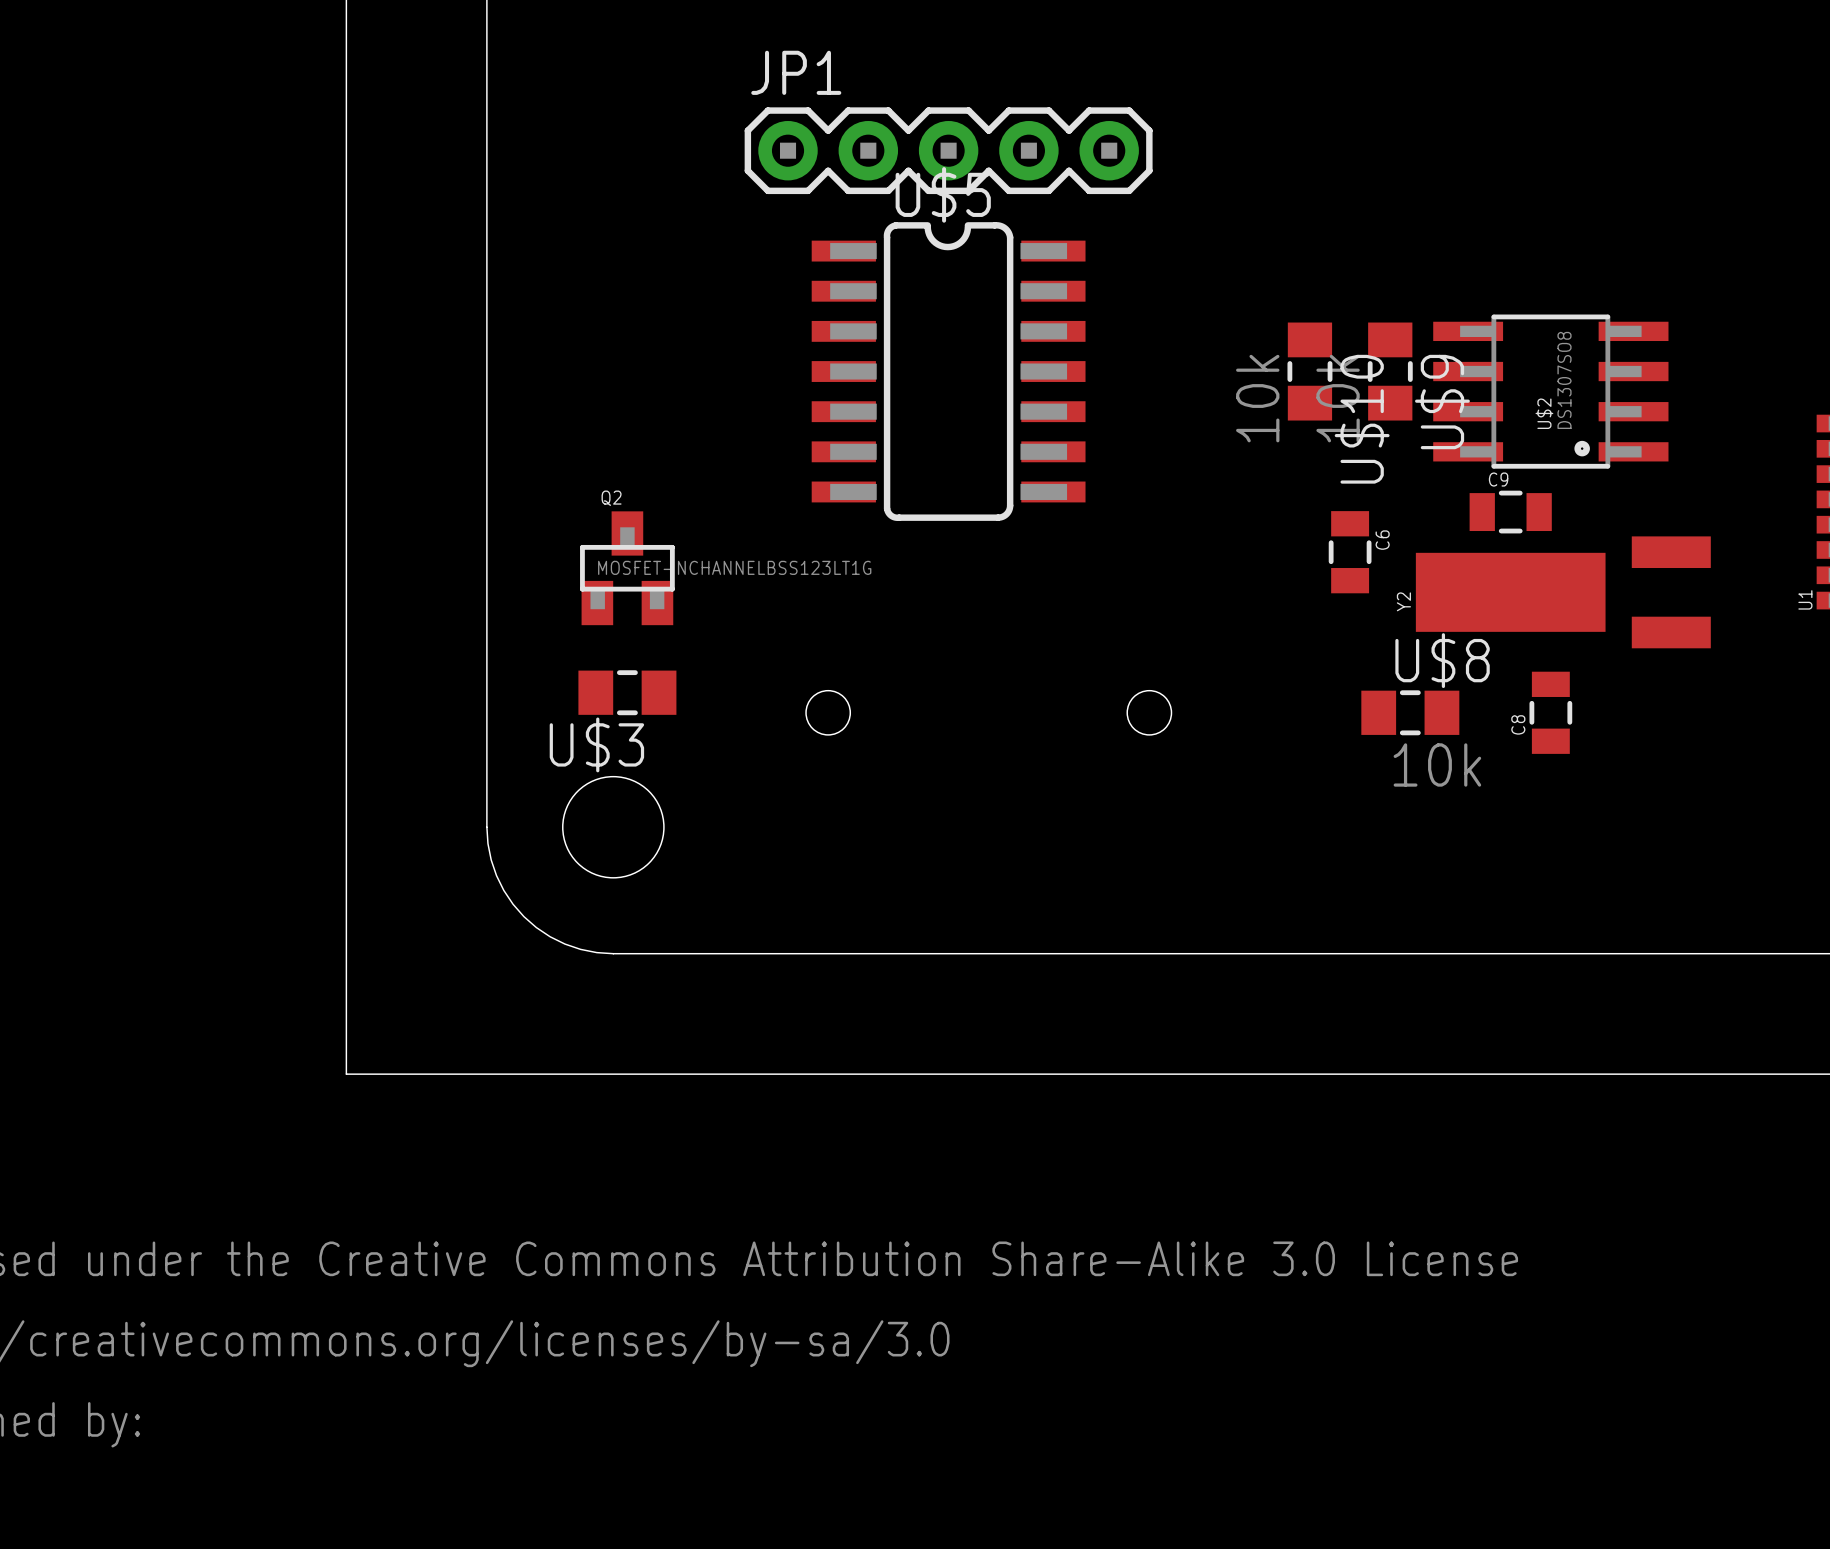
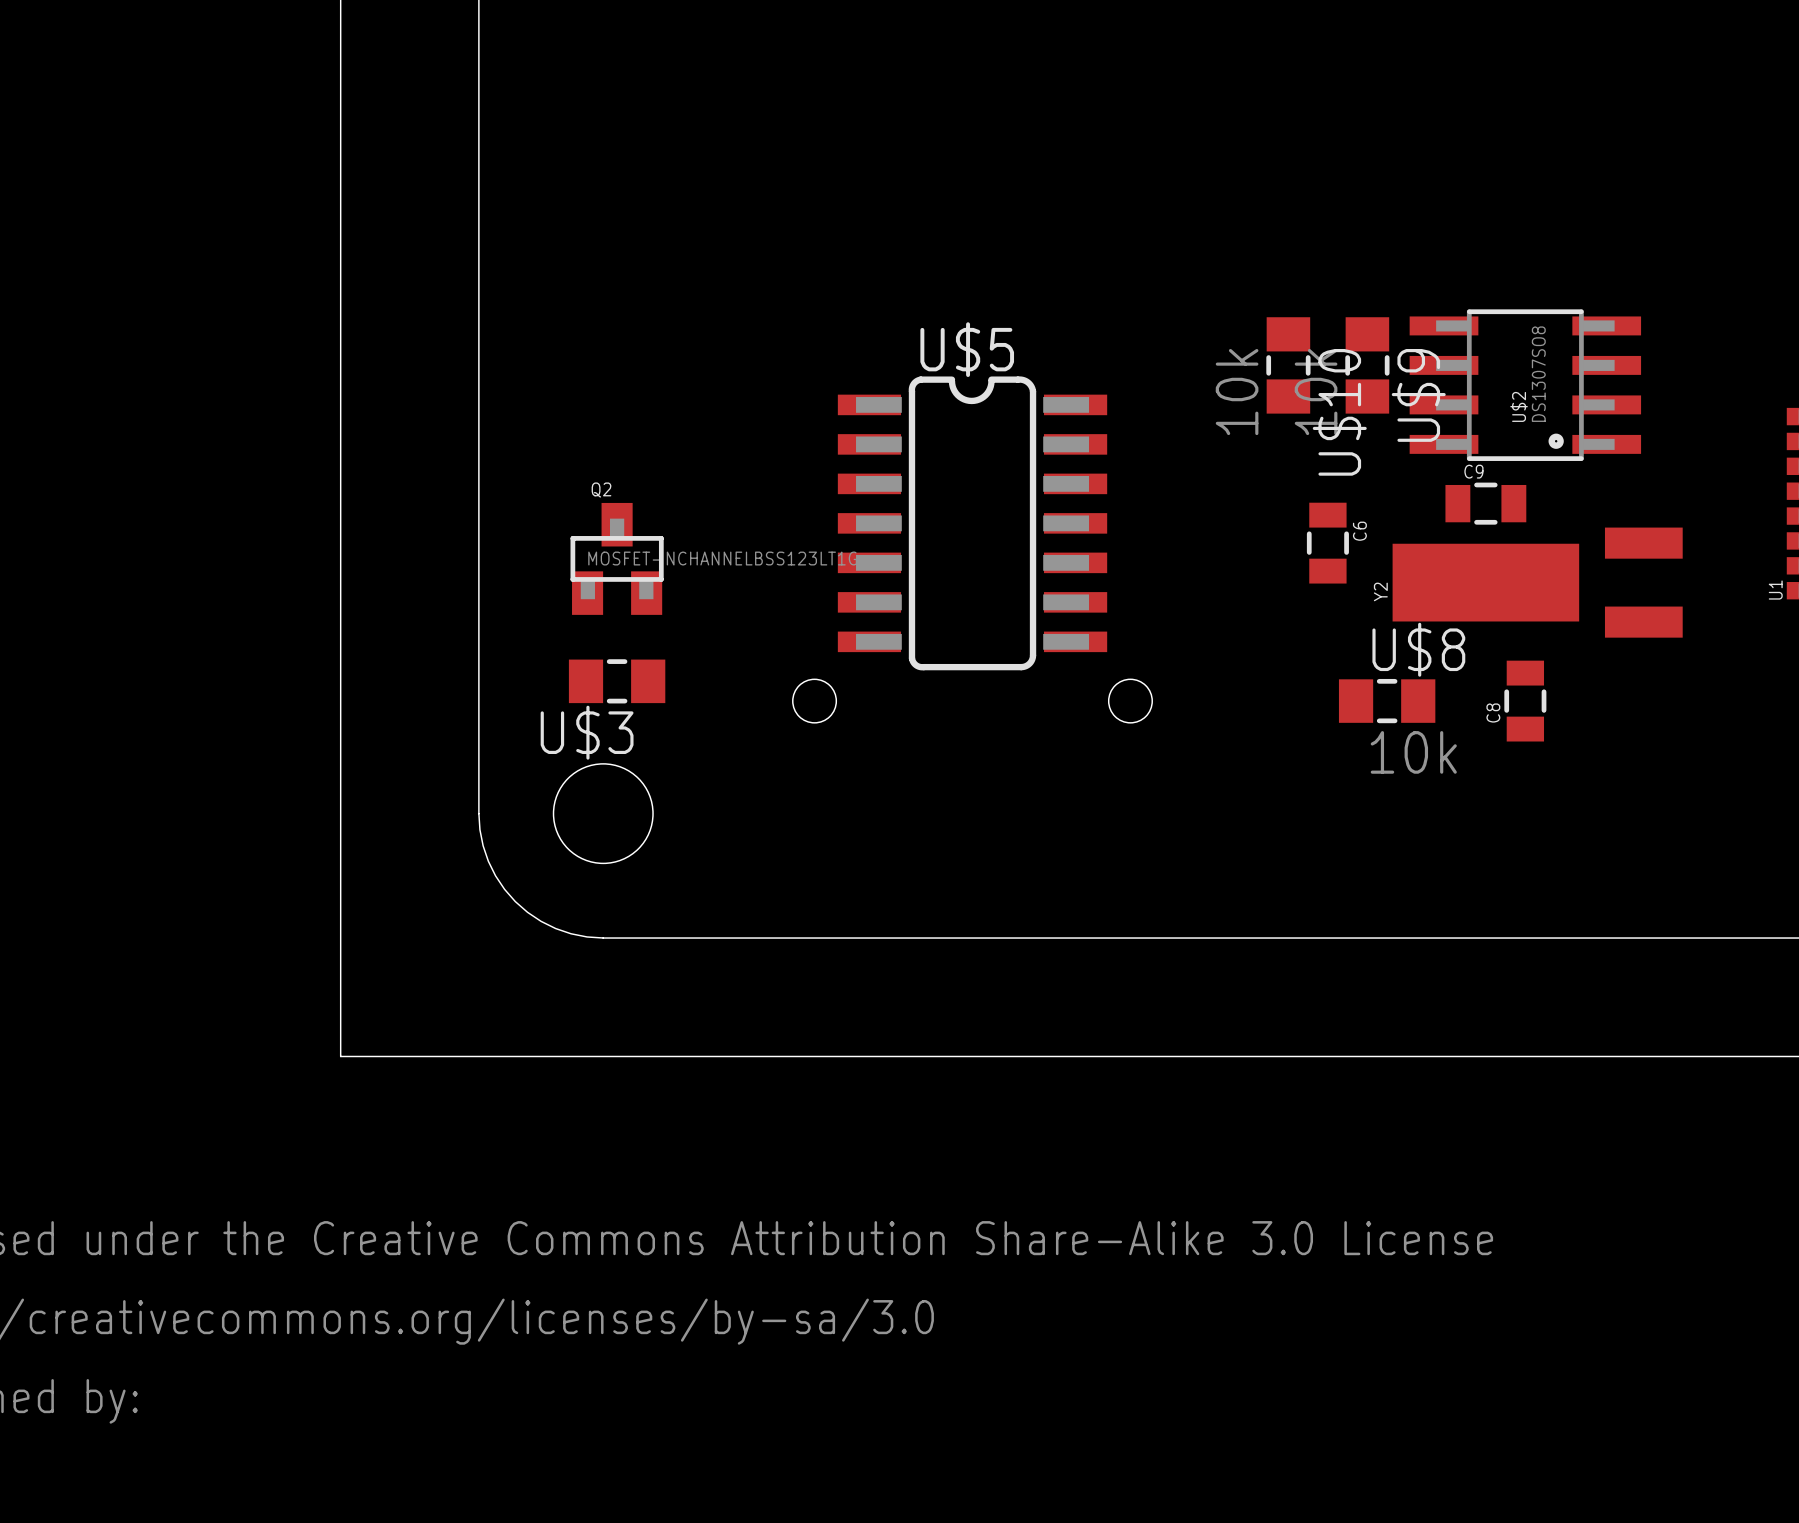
JP1: (948, 150) -> none
U$5 position: (948, 371) -> (972, 523)

